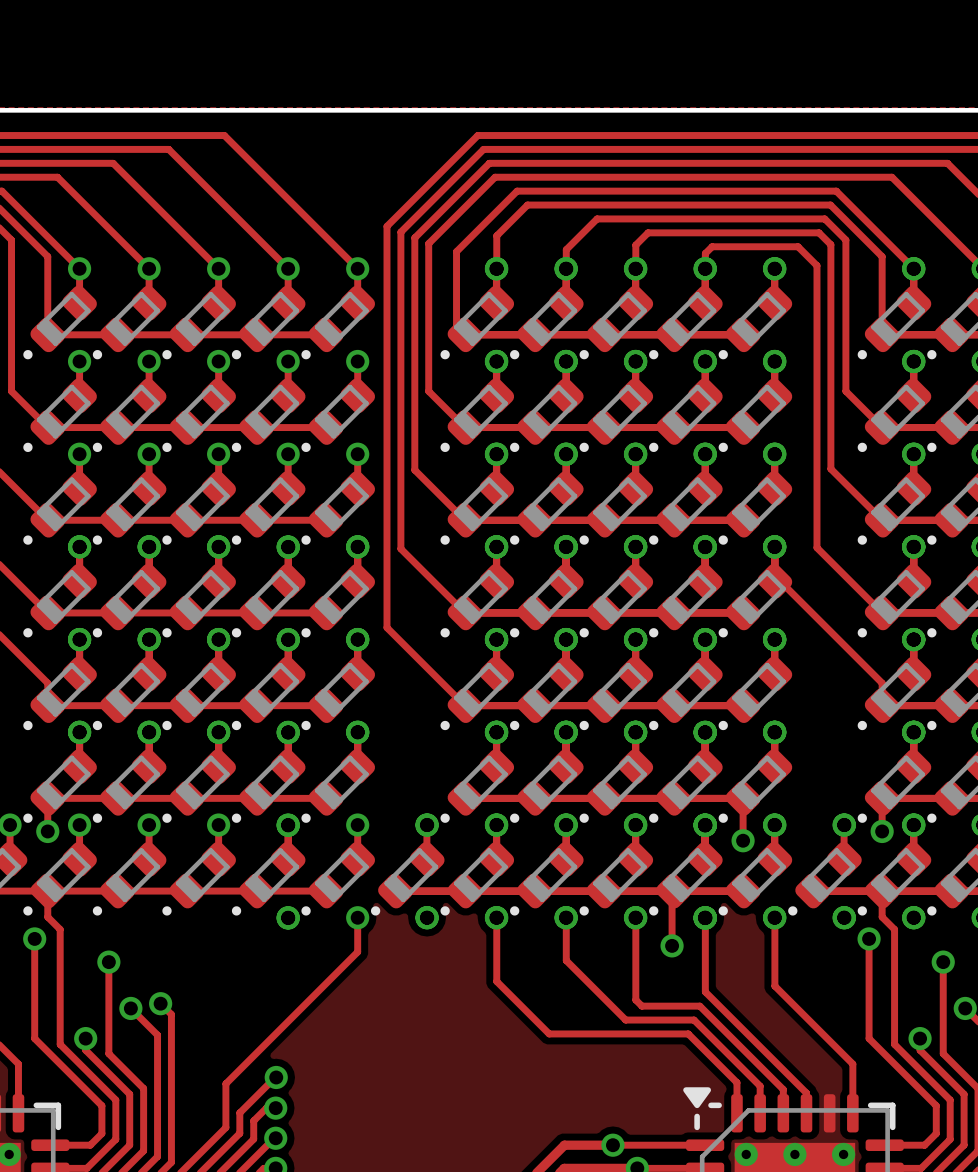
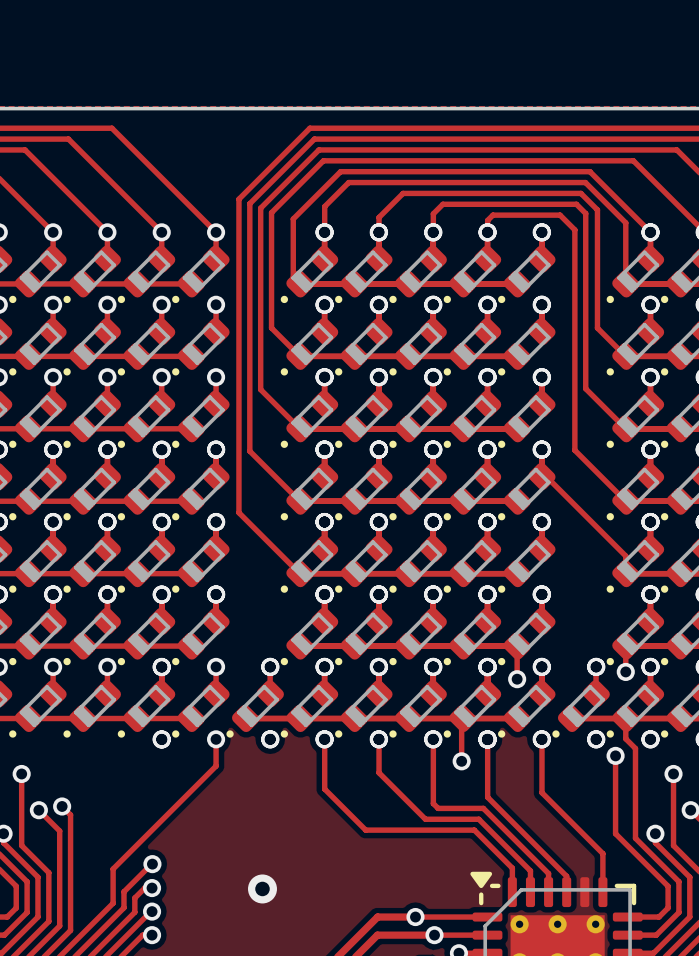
via: none -> (262, 888)

